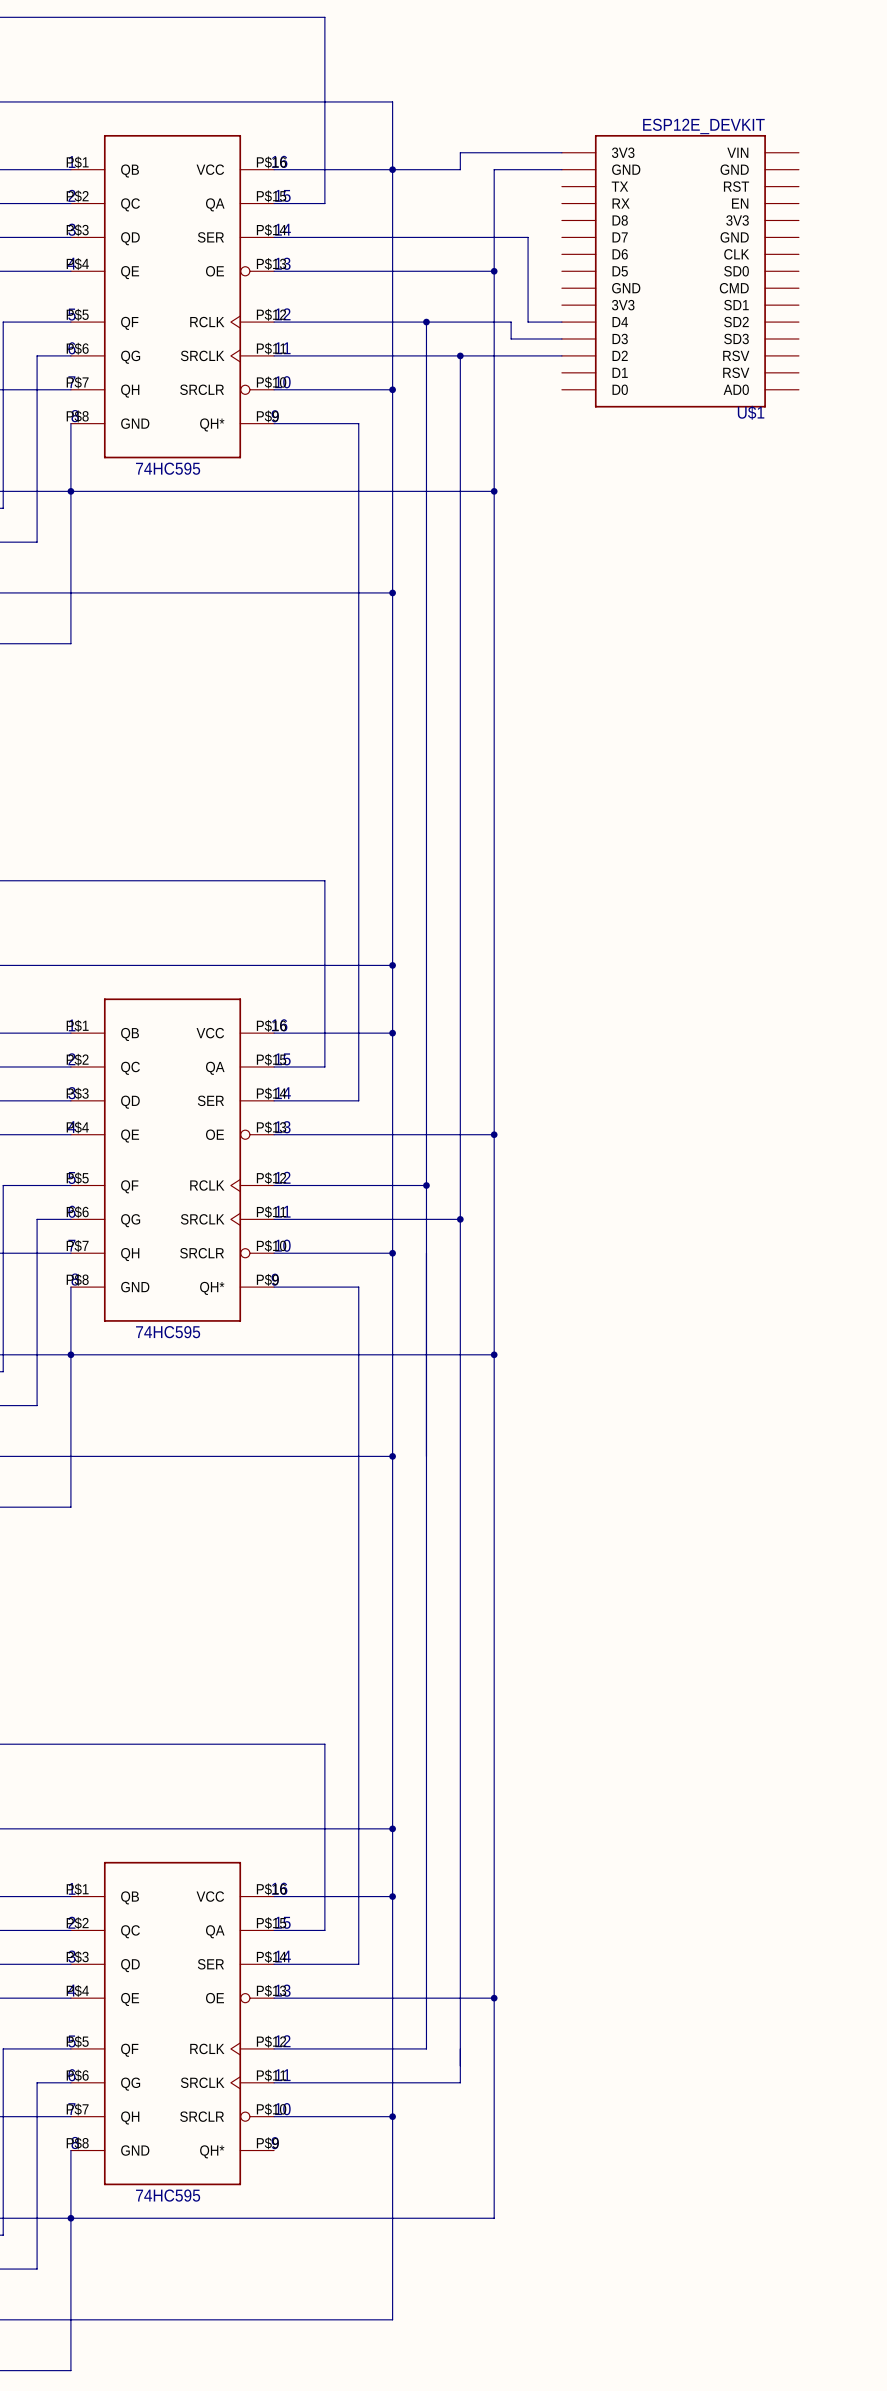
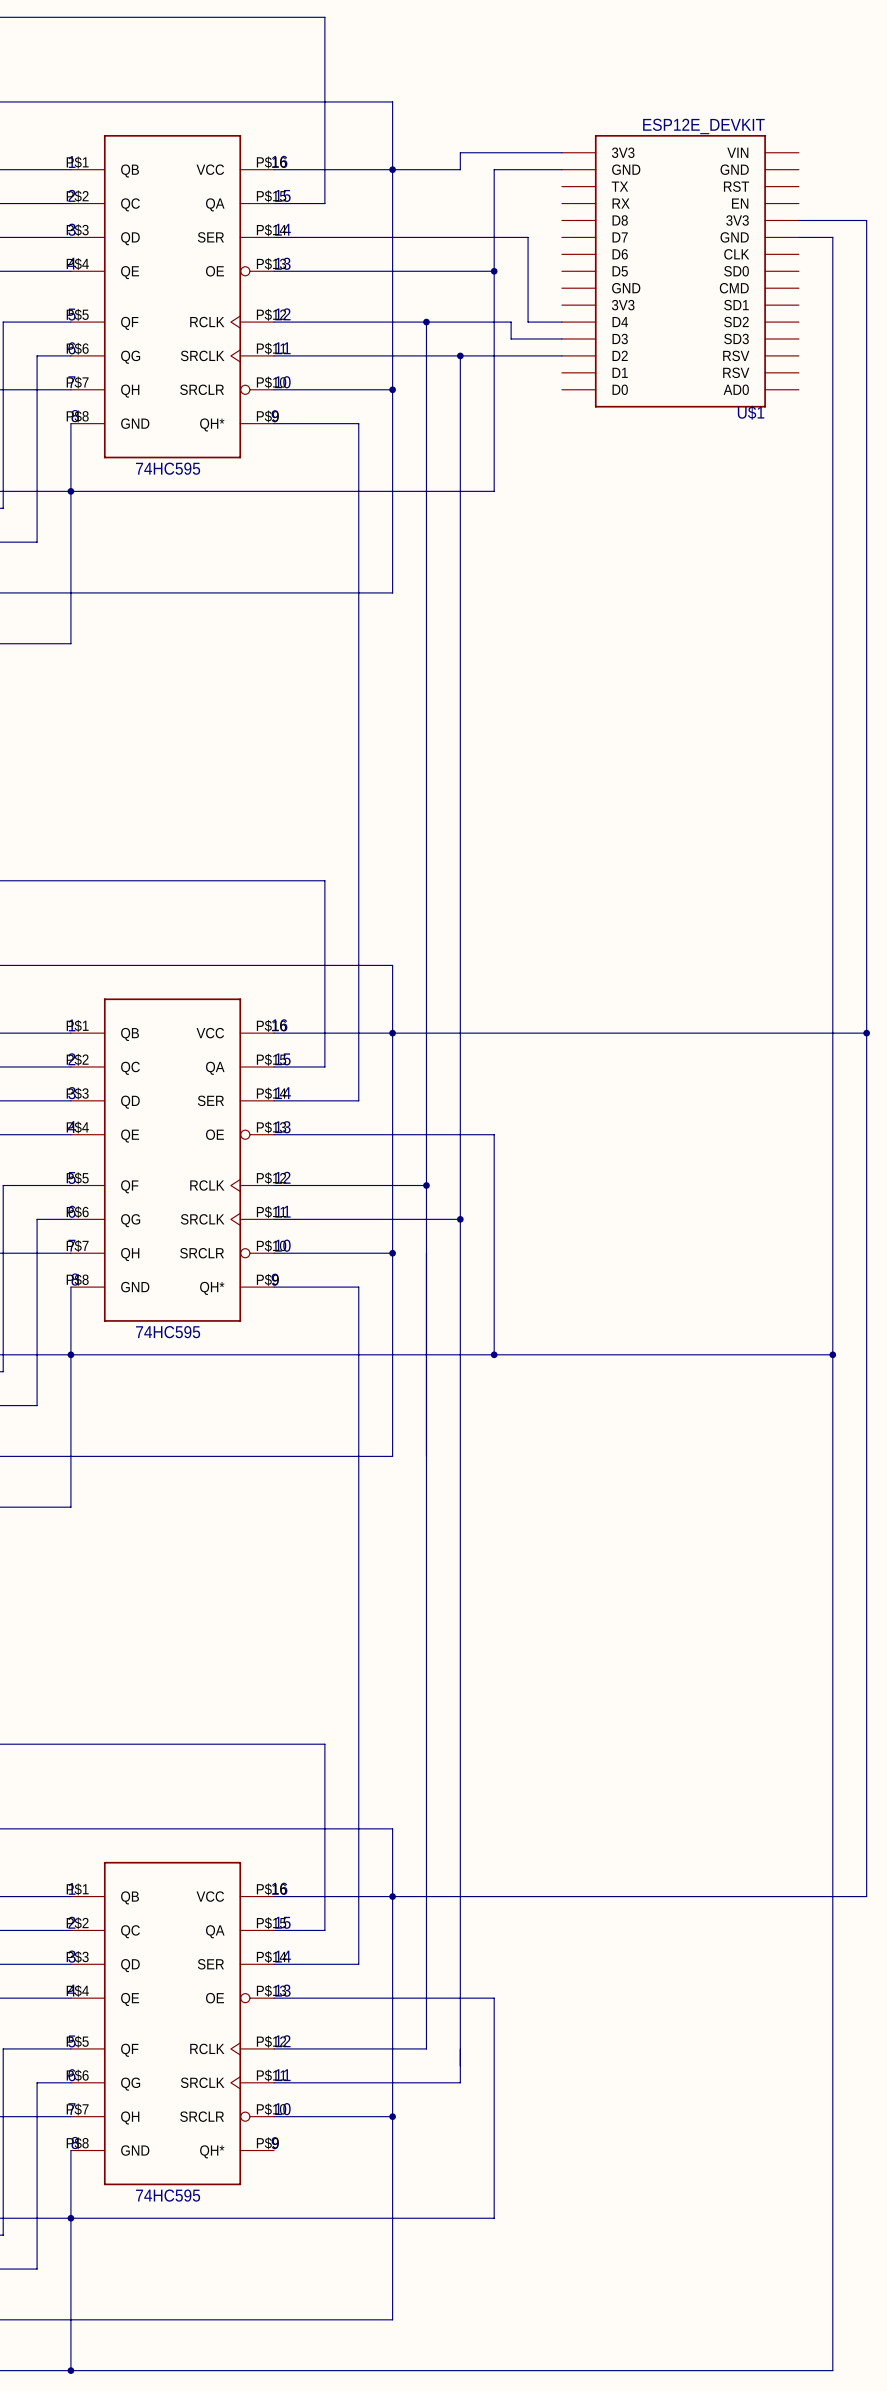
wire: none -> (798, 220) (866, 220) (866, 1896) (392, 1896)
wire: none -> (798, 237) (832, 237) (832, 2370) (70, 2370)
wire: (494, 491) (494, 1134) -> none
junction: (494, 491) -> none
wire: (392, 592) (392, 965) -> none
junction: (392, 592) -> none
junction: (392, 965) -> none
wire: none -> (392, 1033) (866, 1033)
junction: none -> (866, 1033)
junction: (494, 1134) -> none
wire: (494, 1354) (494, 1998) -> (494, 1354) (832, 1354)
junction: none -> (832, 1354)
wire: (392, 1456) (392, 1828) -> none
junction: (392, 1456) -> none
junction: (392, 1828) -> none
junction: (494, 1998) -> none
junction: none -> (70, 2370)

